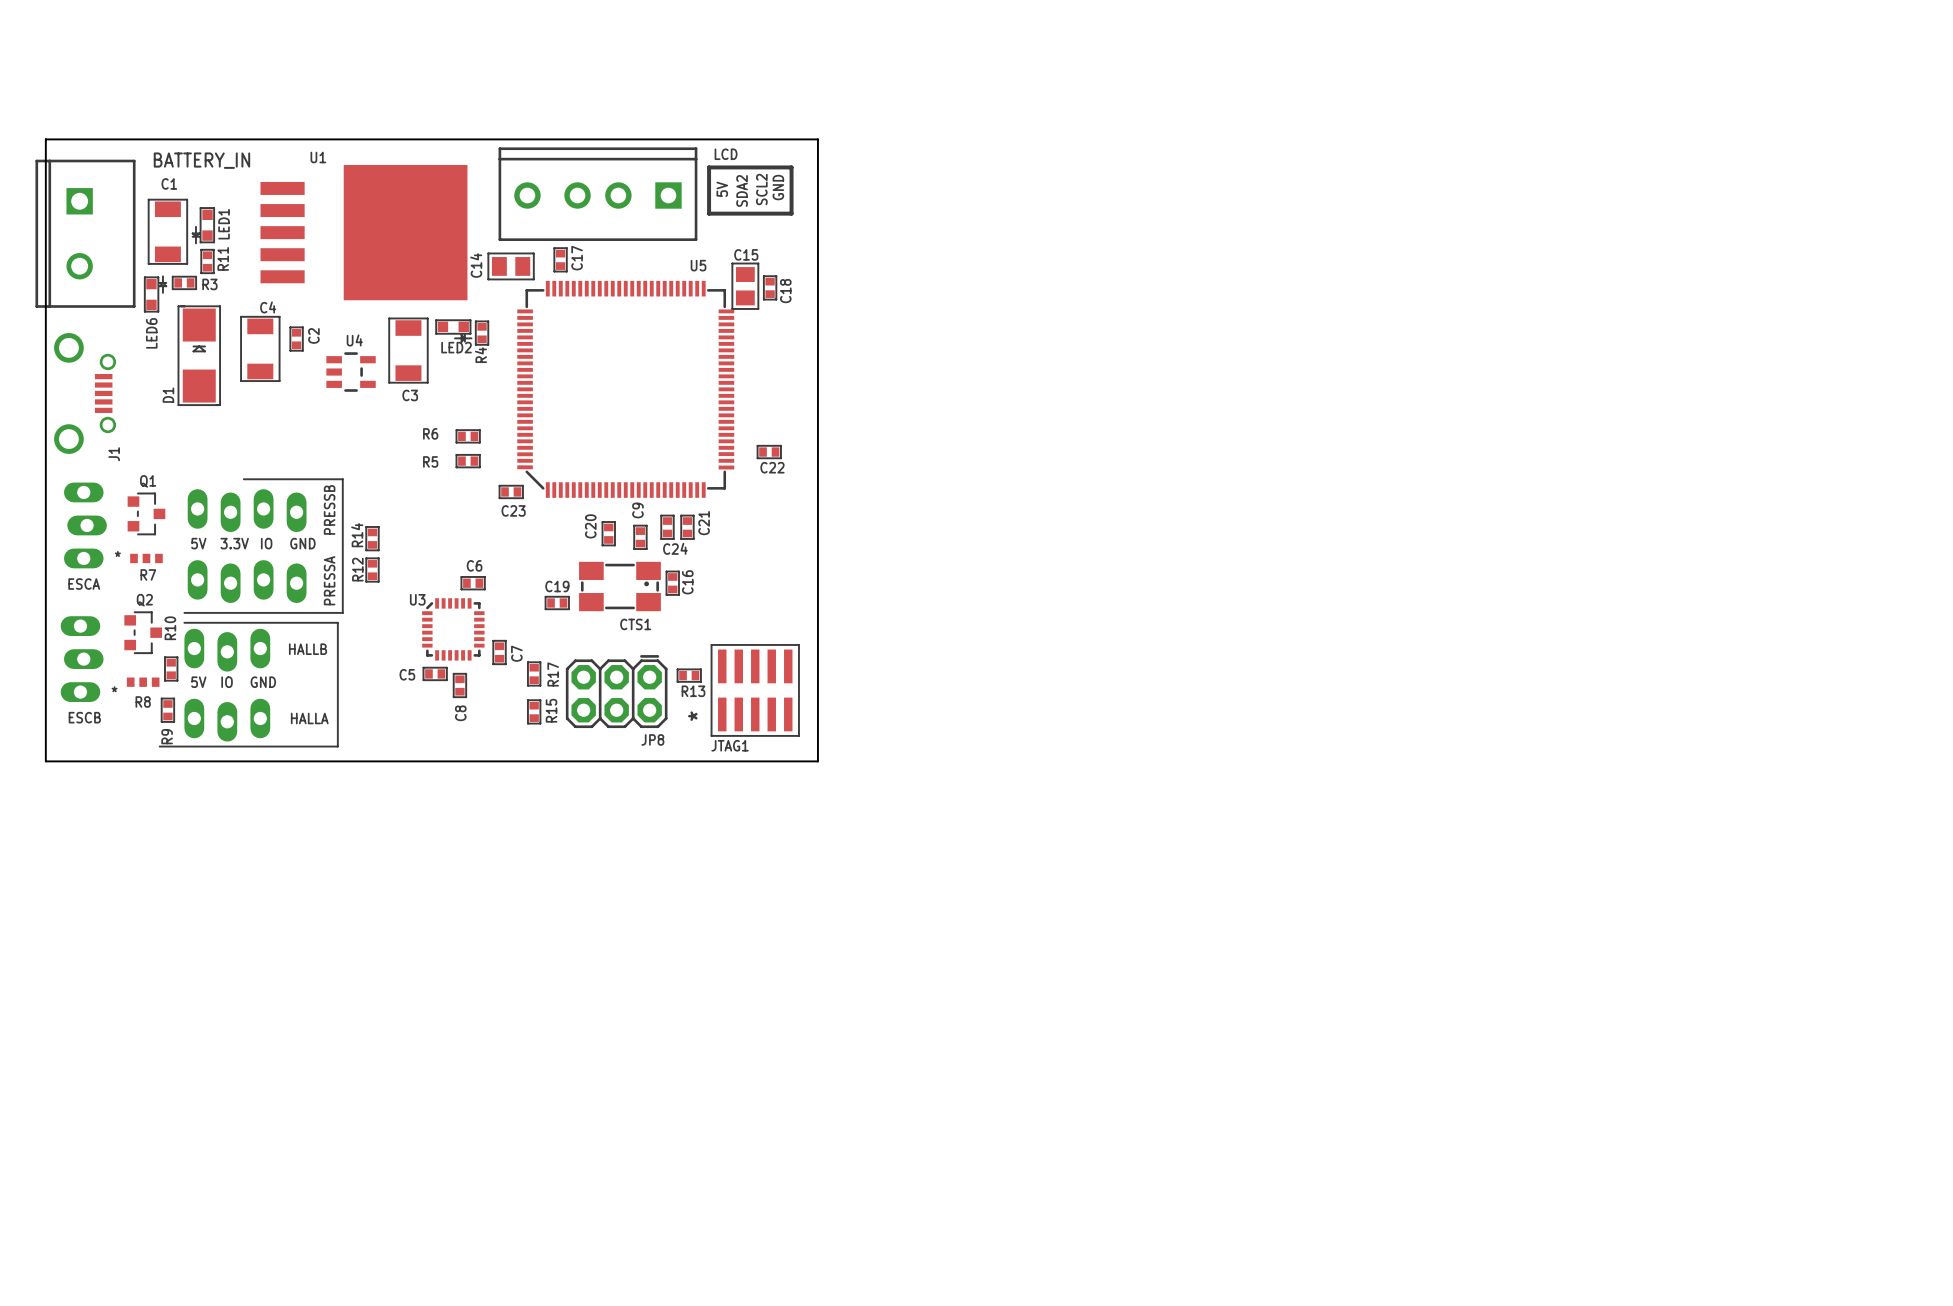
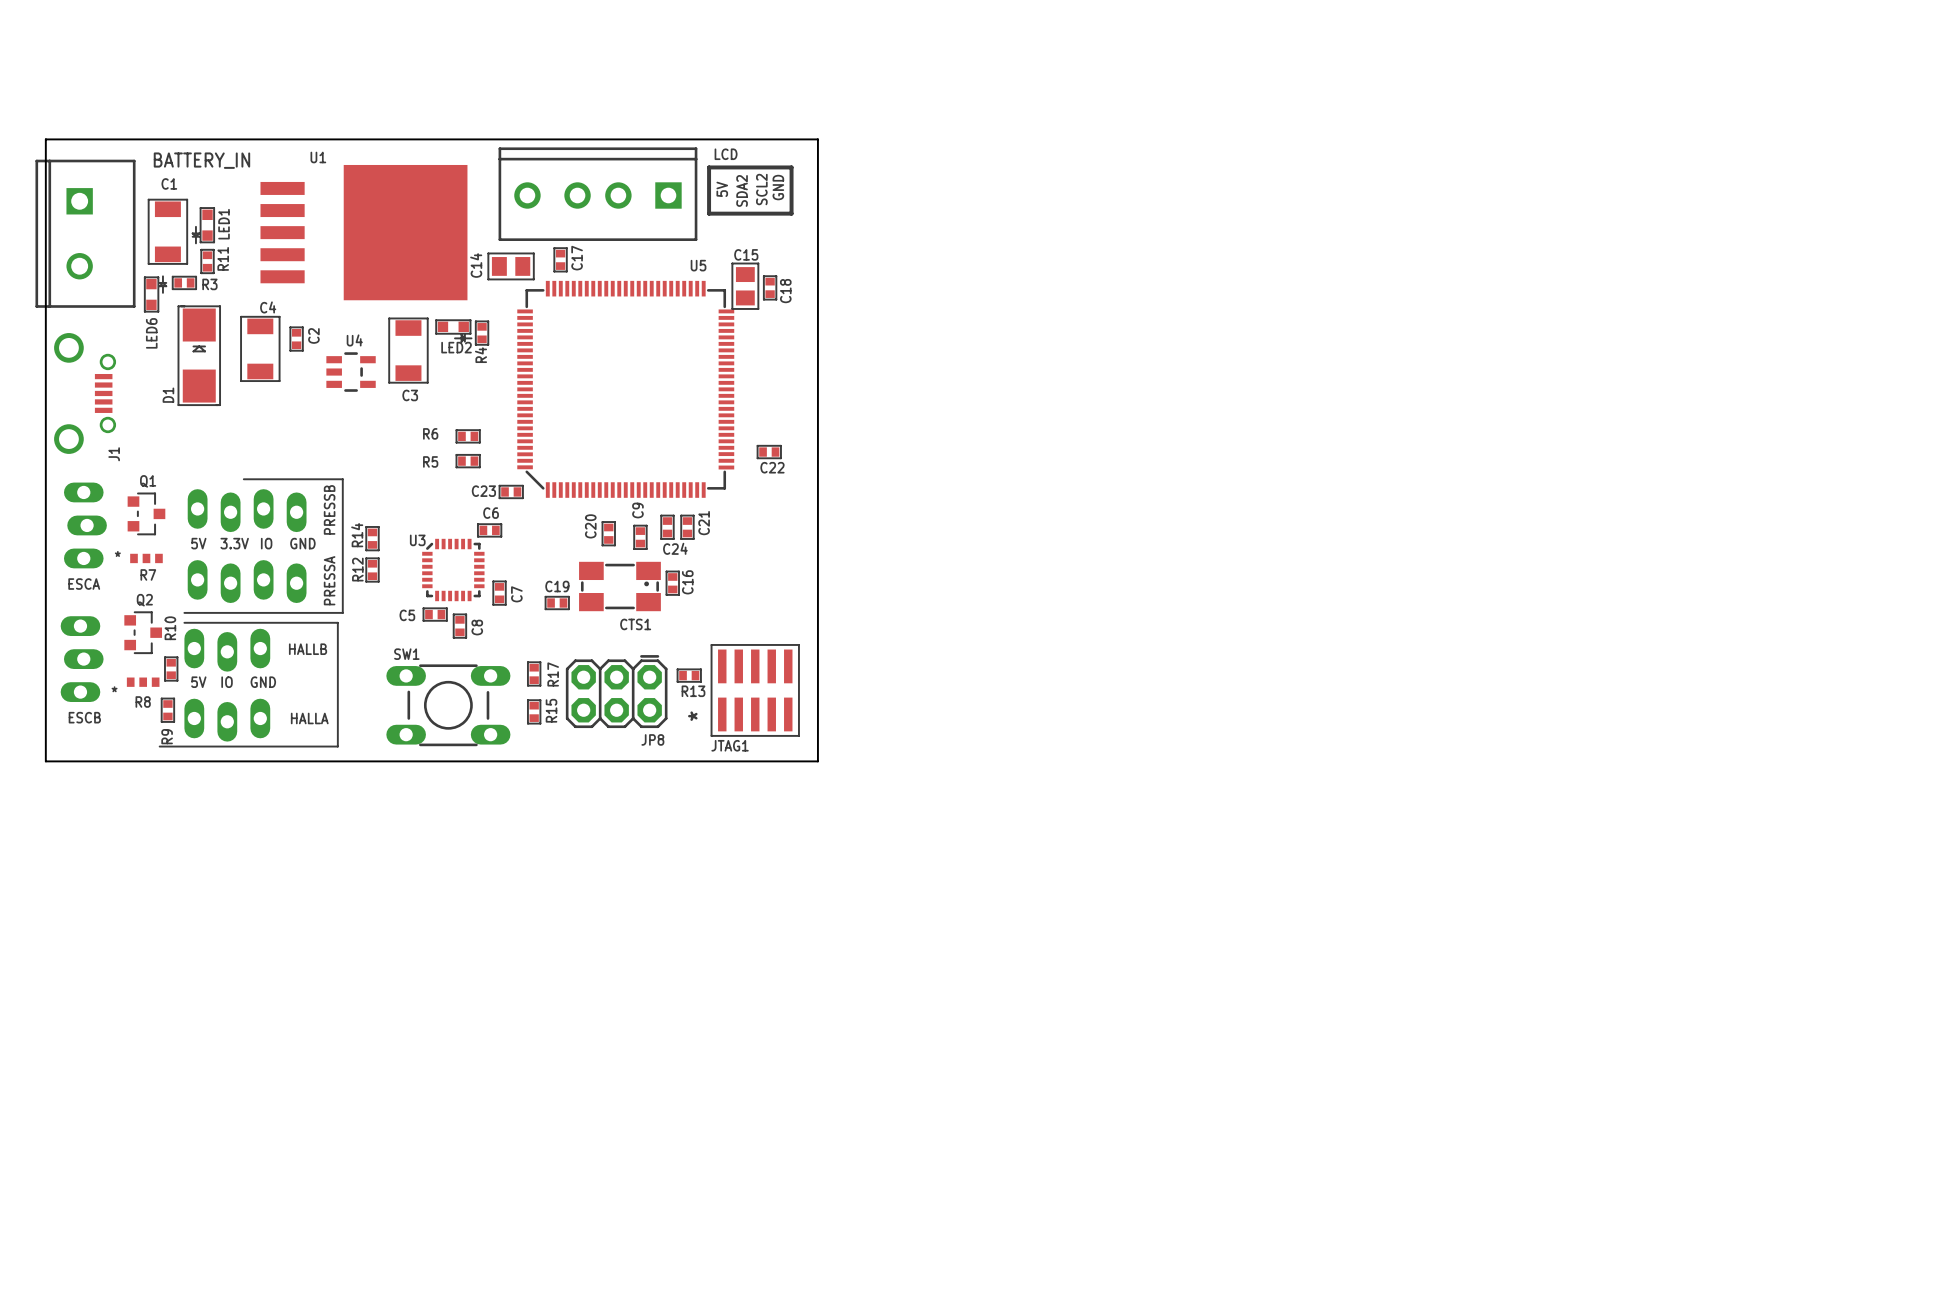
C23 name position: C23 (513, 510) -> C23 (483, 491)
C6 position: (473, 583) -> (489, 530)
U3 position: (453, 629) -> (453, 570)
C7 position: (499, 652) -> (499, 593)
C5 position: (435, 673) -> (435, 614)
C8 position: (459, 685) -> (459, 626)
SW1: none -> (448, 705)
C8 name position: C8 (460, 713) -> C8 (477, 627)

